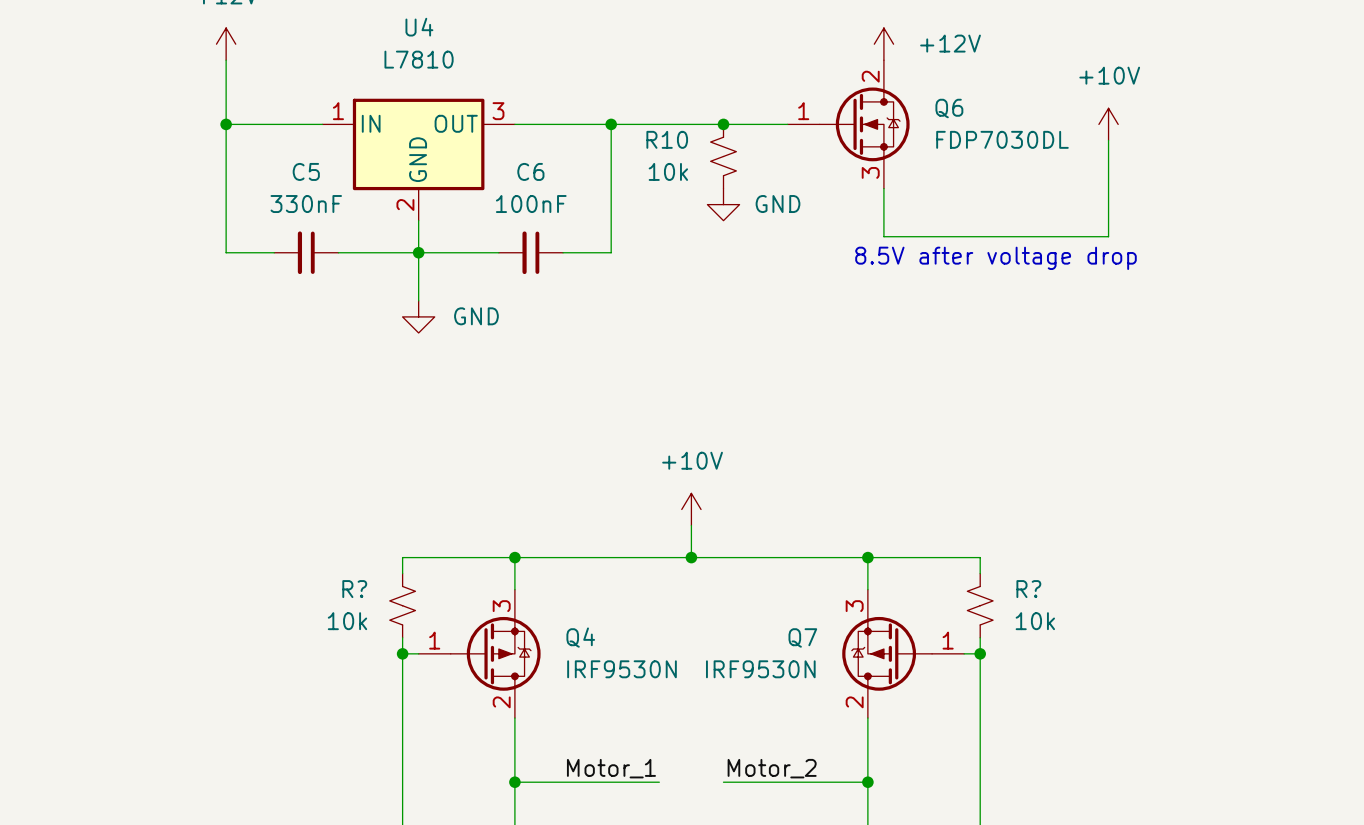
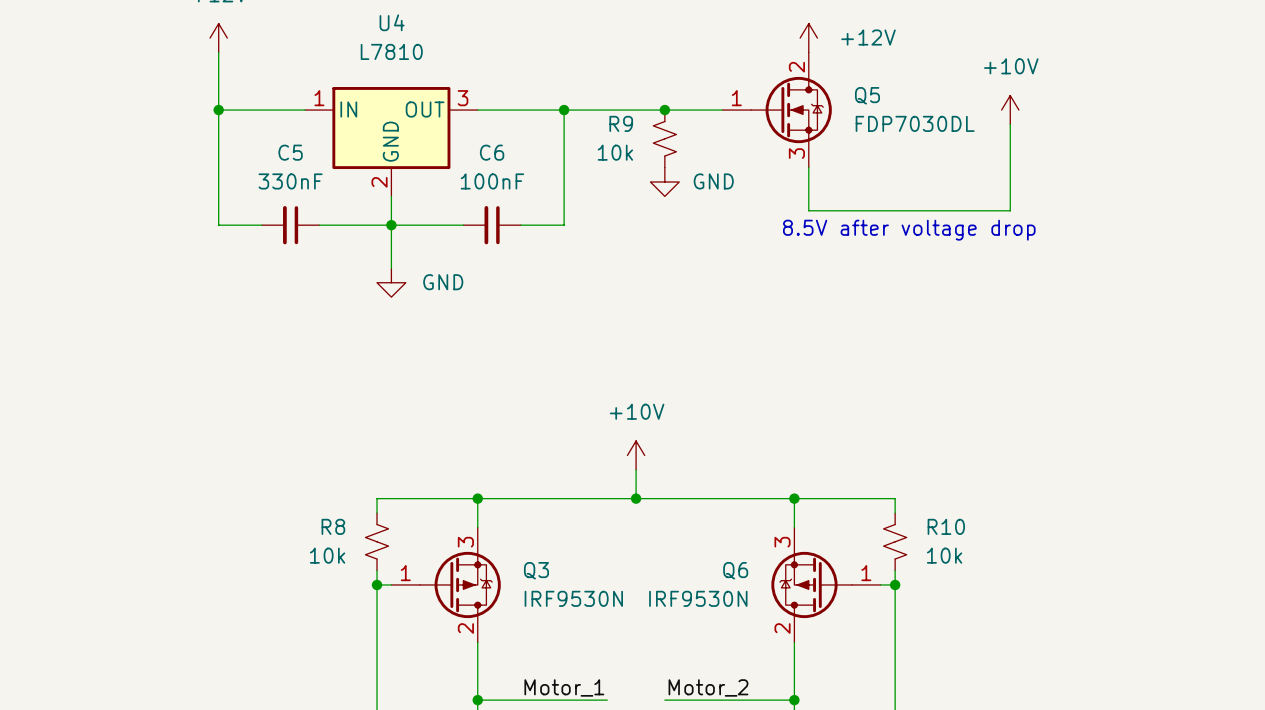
Q6 name: Q6 (949, 108) -> Q5 (867, 95)
R10 name: R10 (667, 139) -> R9 (621, 123)
R? name: R? (354, 589) -> R8 (333, 526)
R? name: R? (1028, 589) -> R10 (946, 526)
Q4 name: Q4 (580, 637) -> Q3 (536, 570)
Q7 name: Q7 (802, 637) -> Q6 (735, 570)

